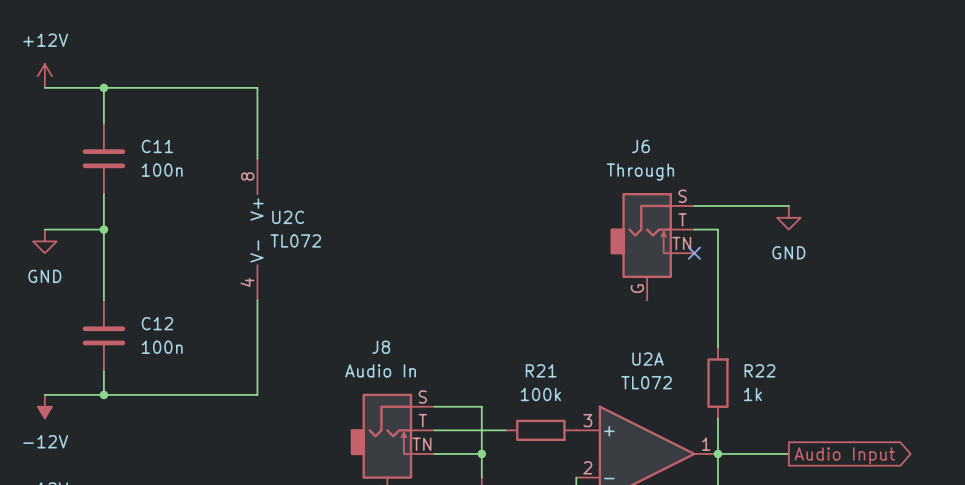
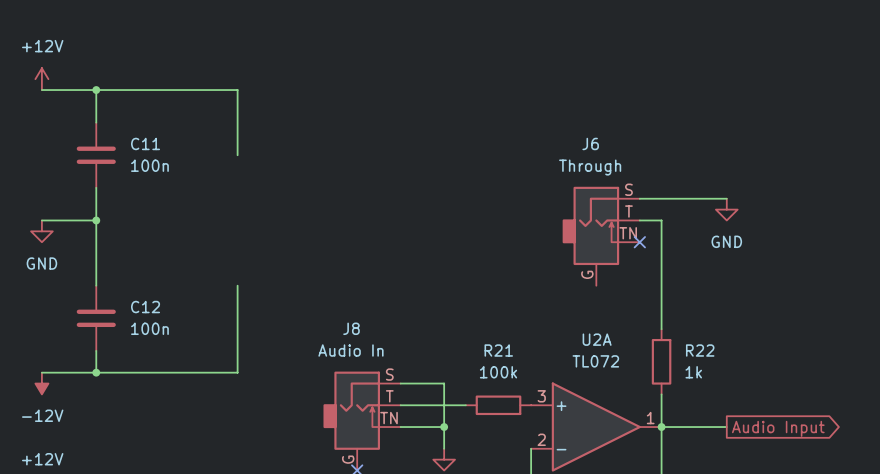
U2C: TL072 (257, 229) -> none

